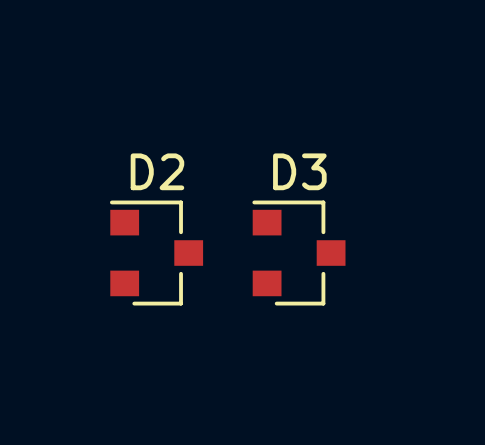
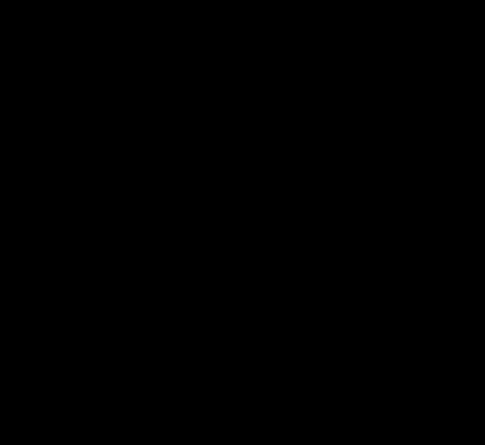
D2: (156, 253) -> none
D3: (298, 253) -> none

